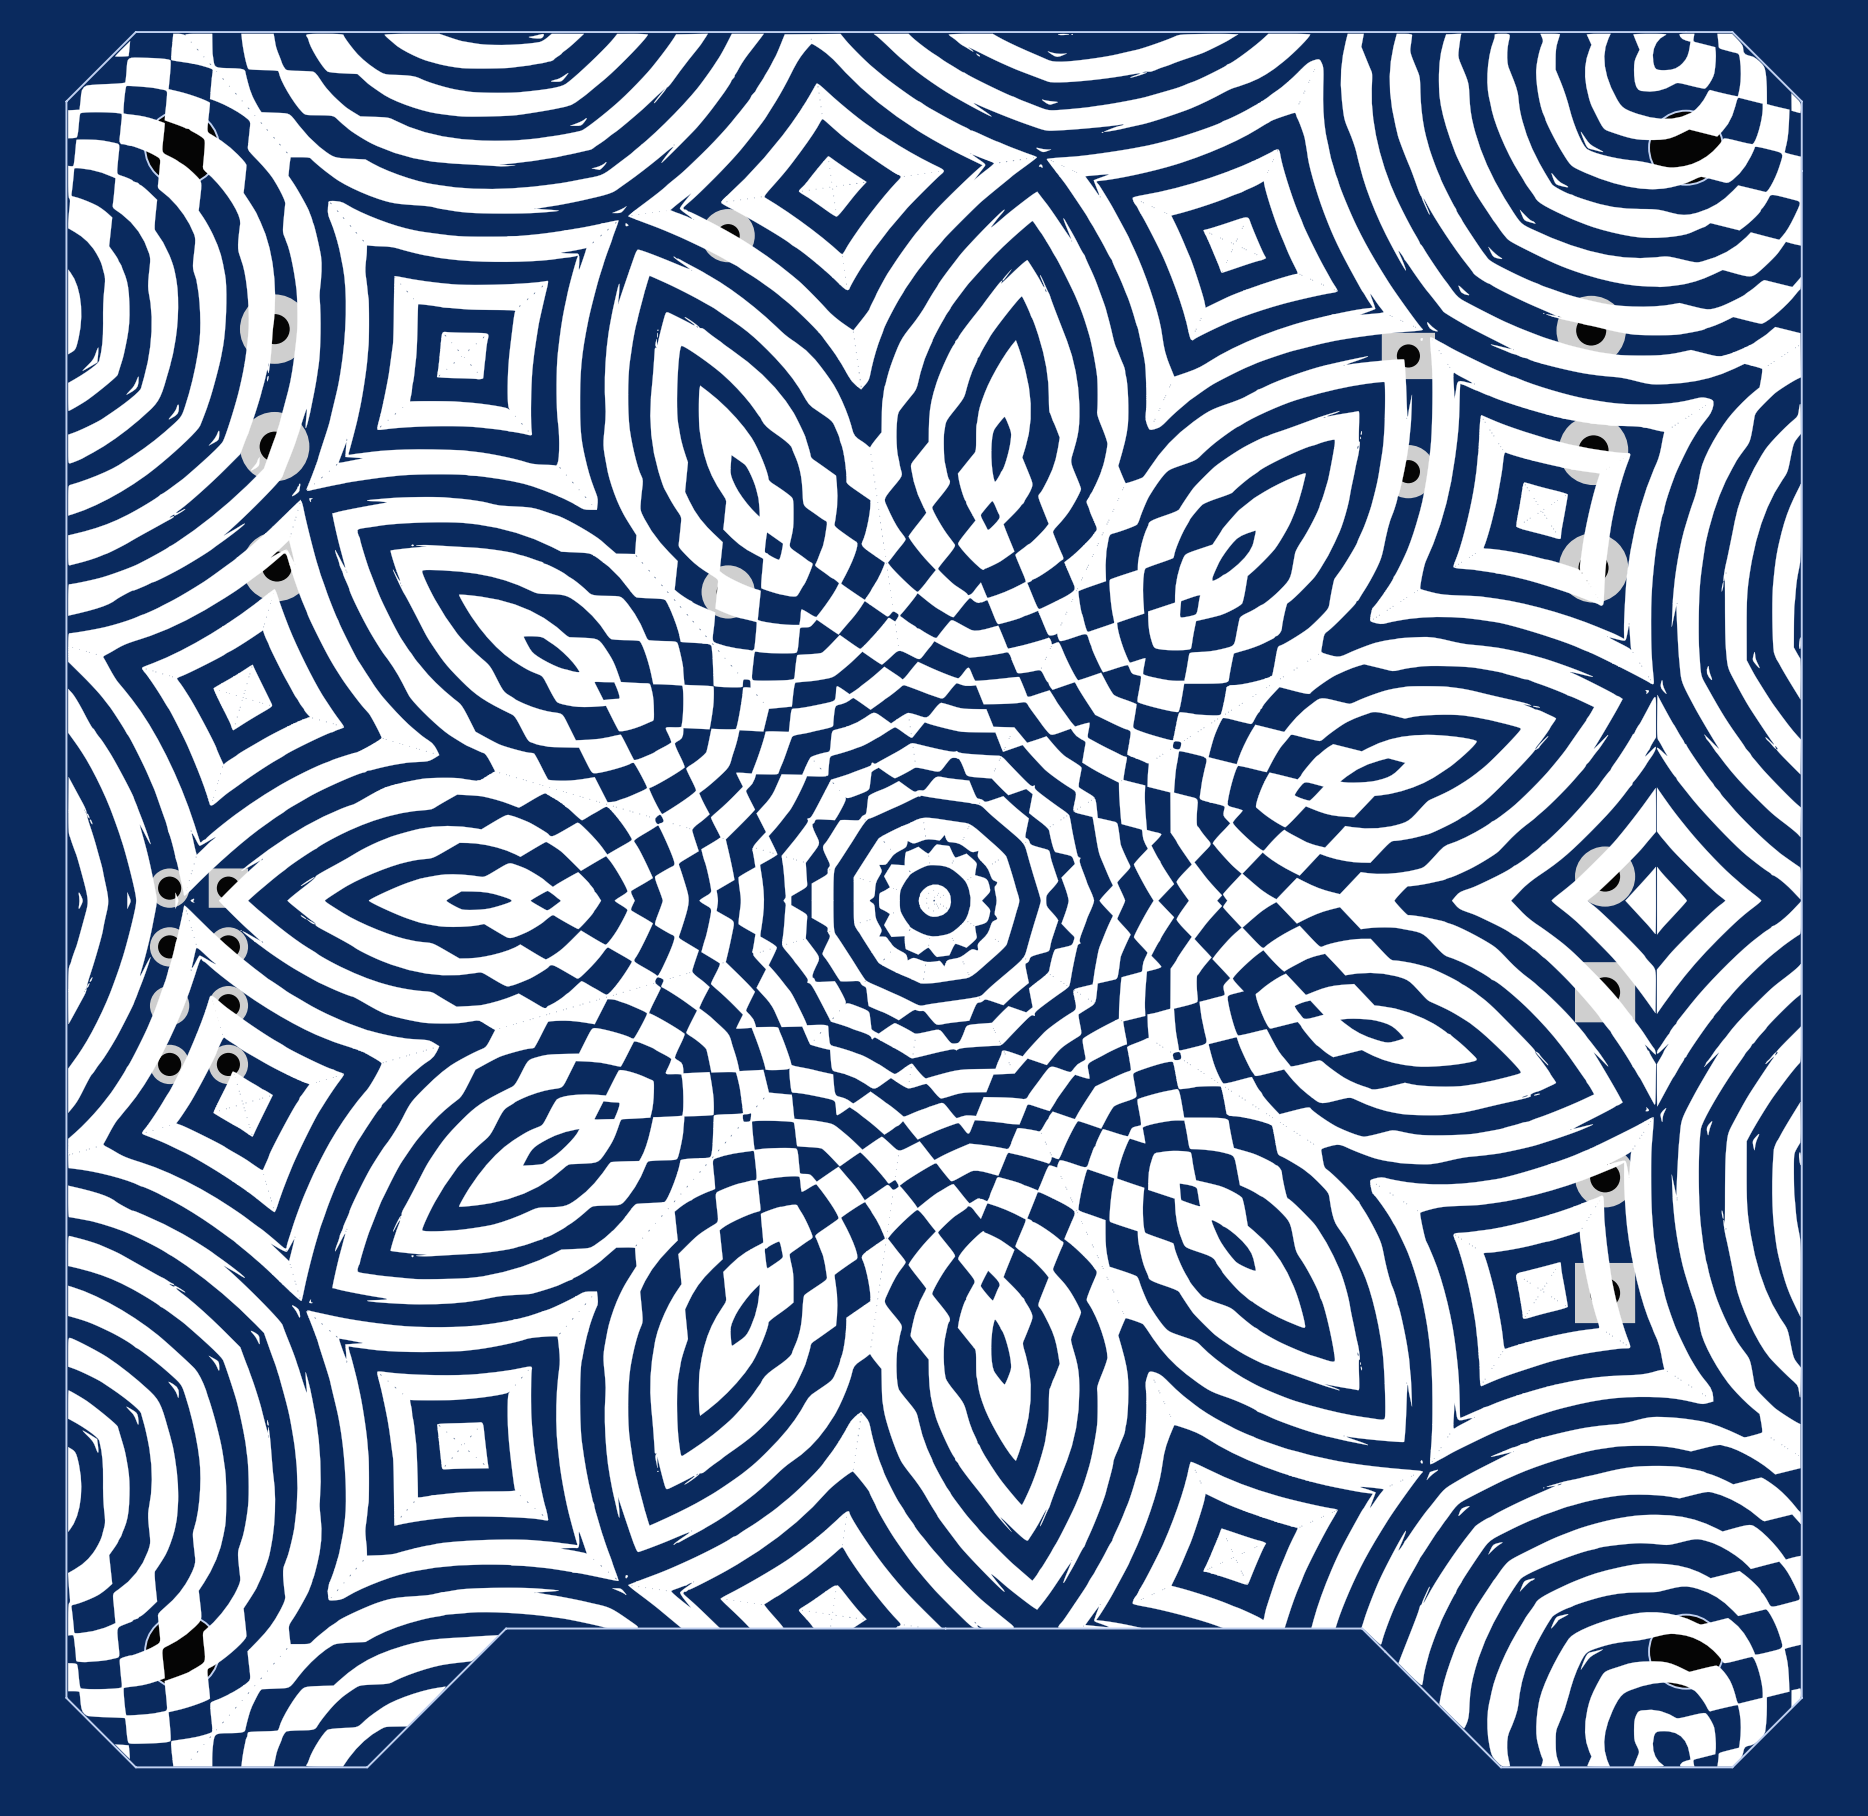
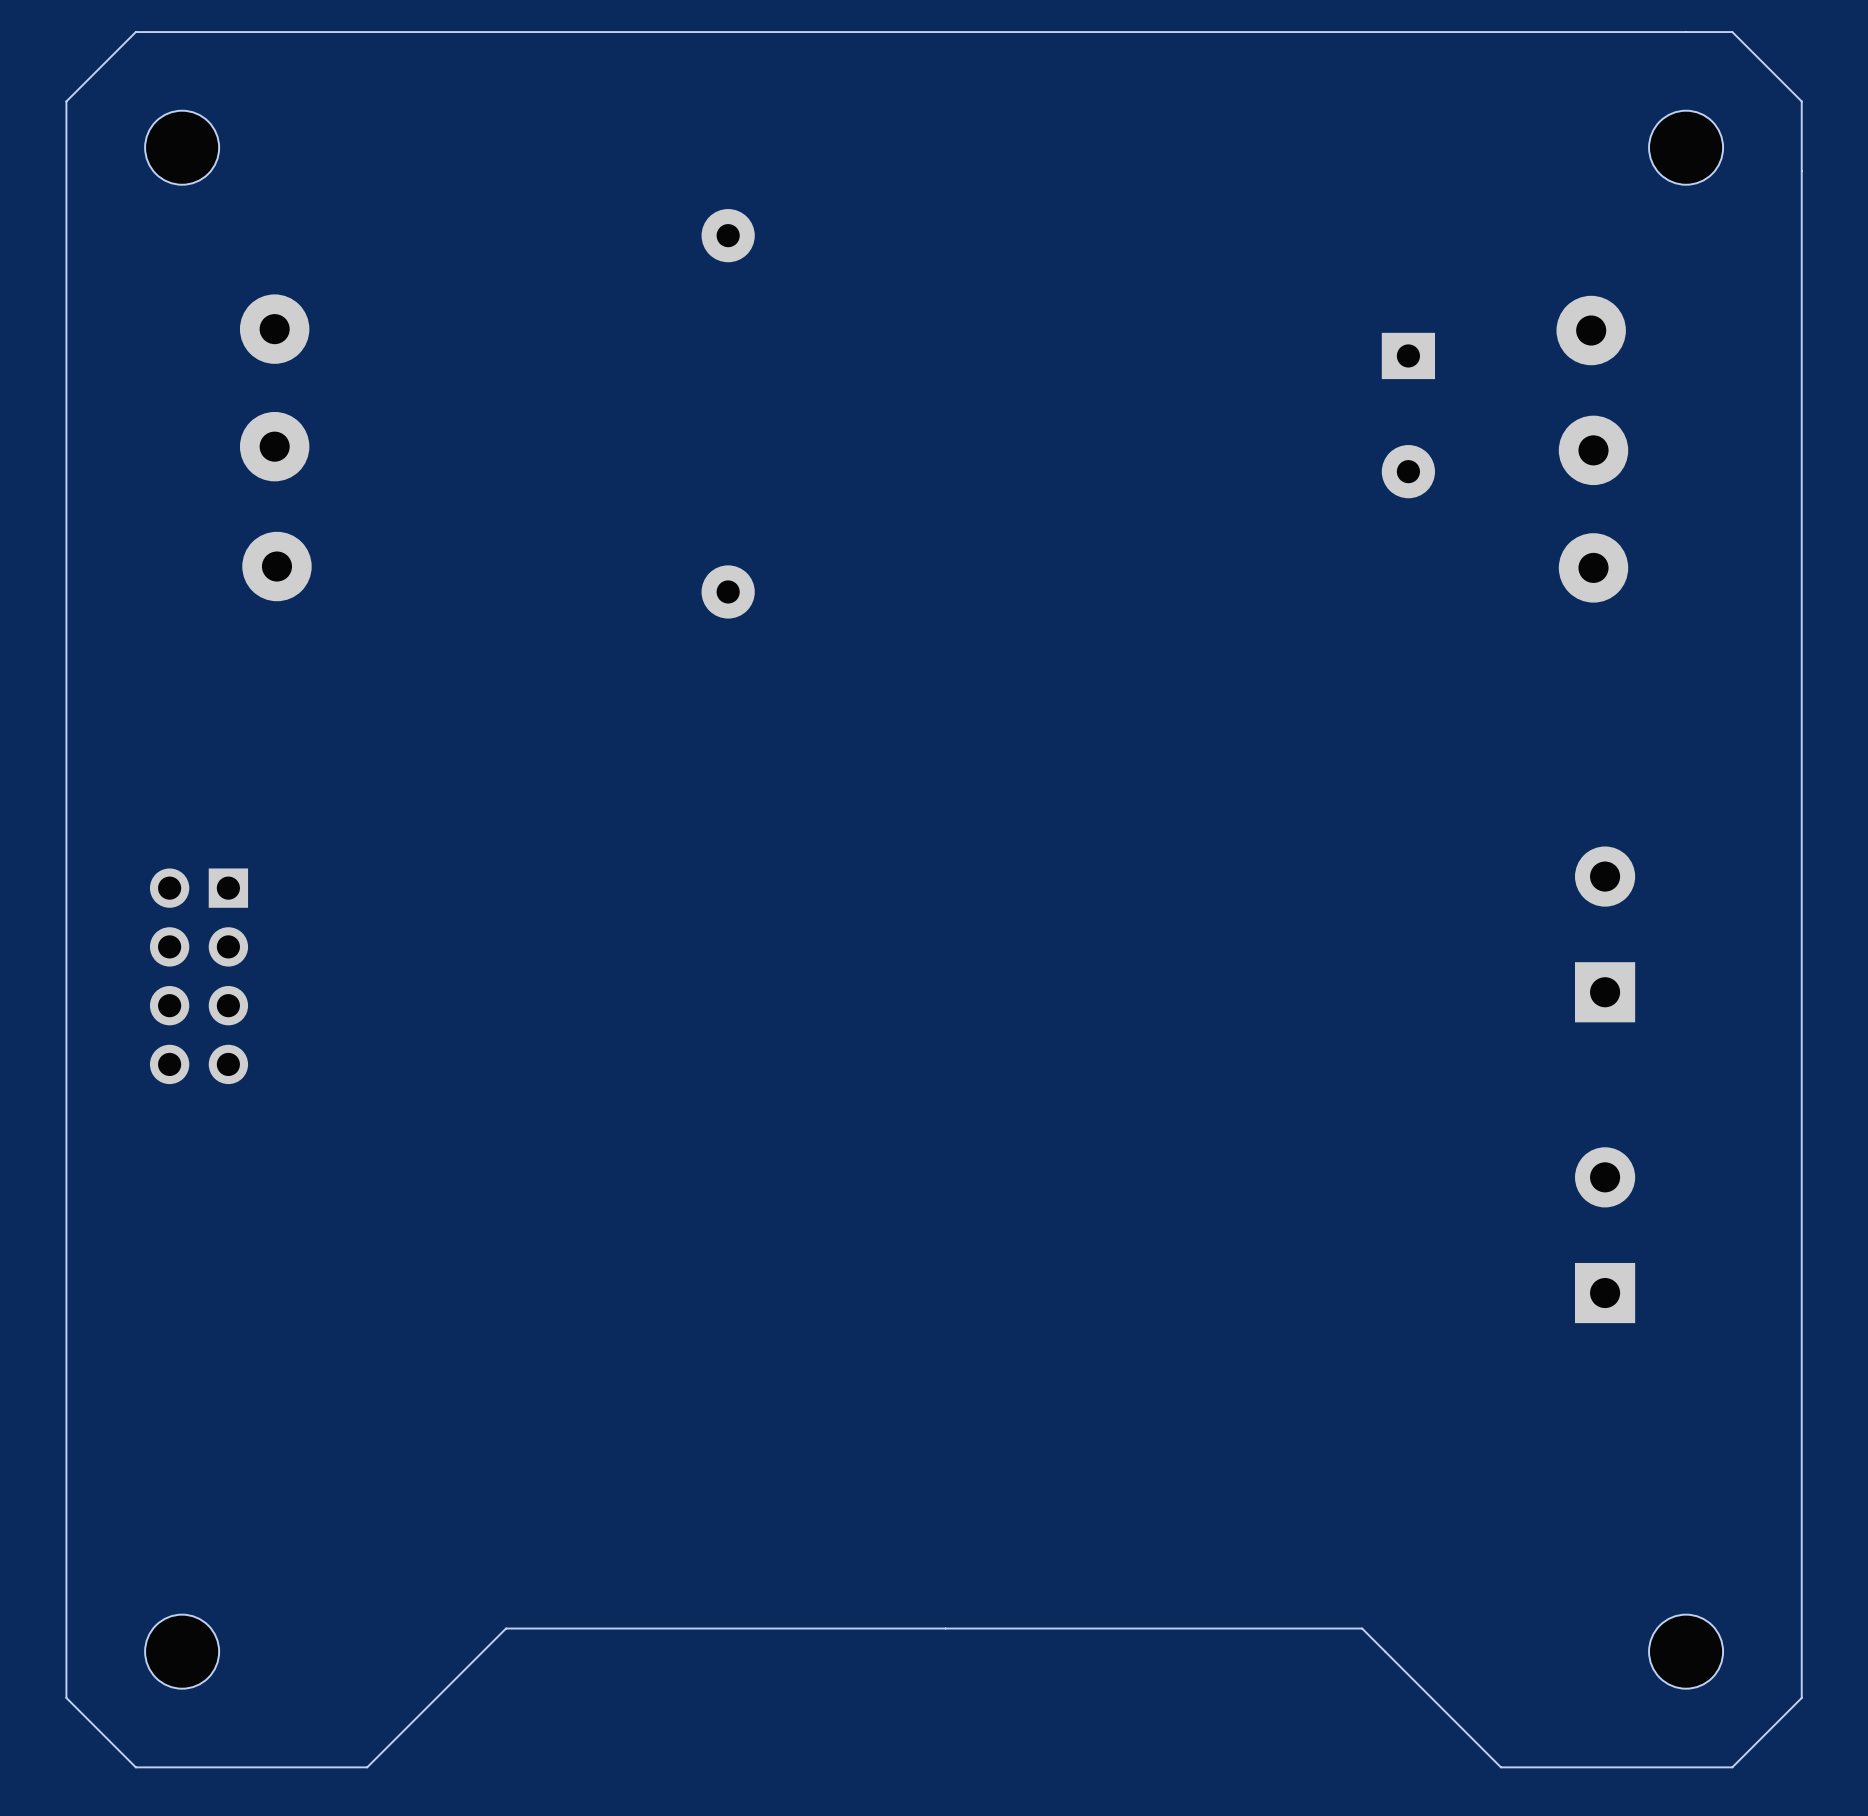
drawing: [67, 33, 1802, 1767] -> none

